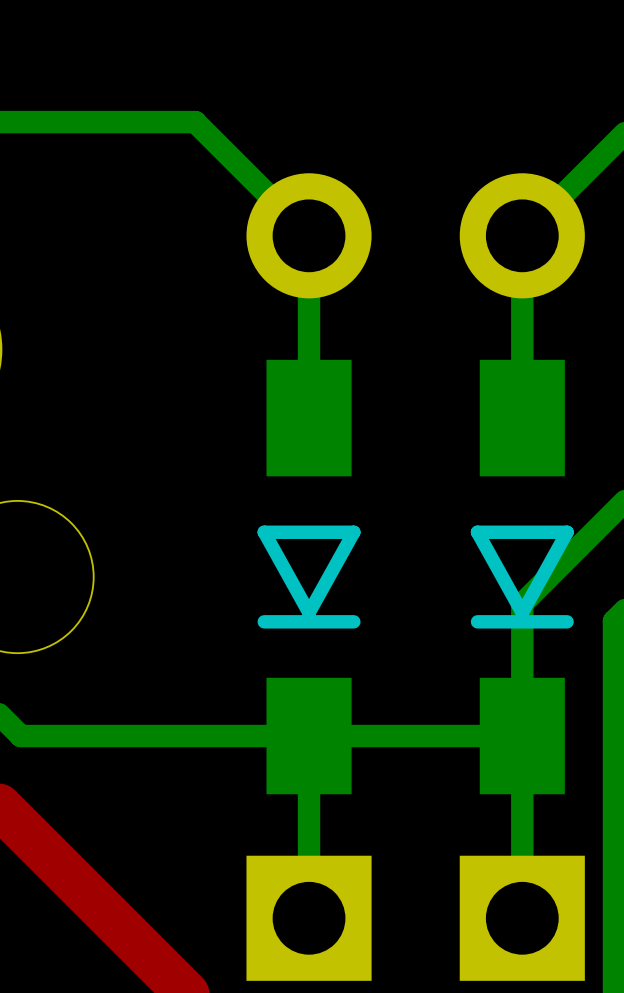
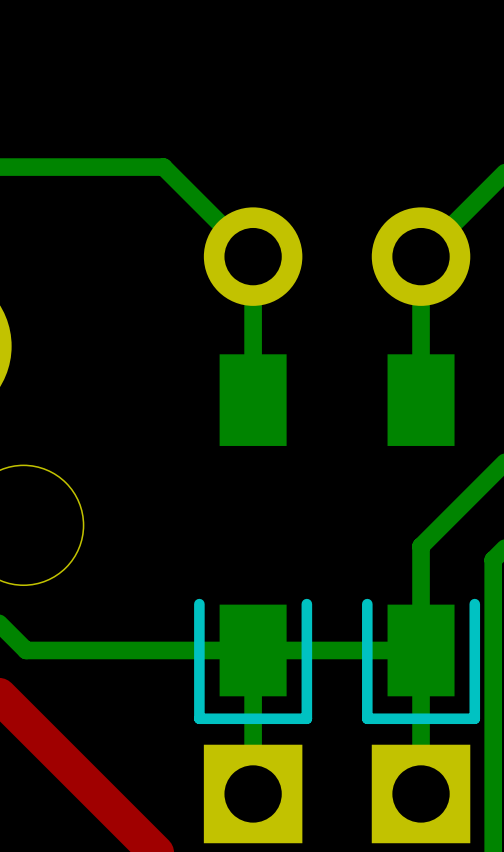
part footprint: [246, 173, 372, 981] -> [194, 207, 313, 844]
part footprint: [459, 173, 585, 981] -> [362, 207, 481, 844]

